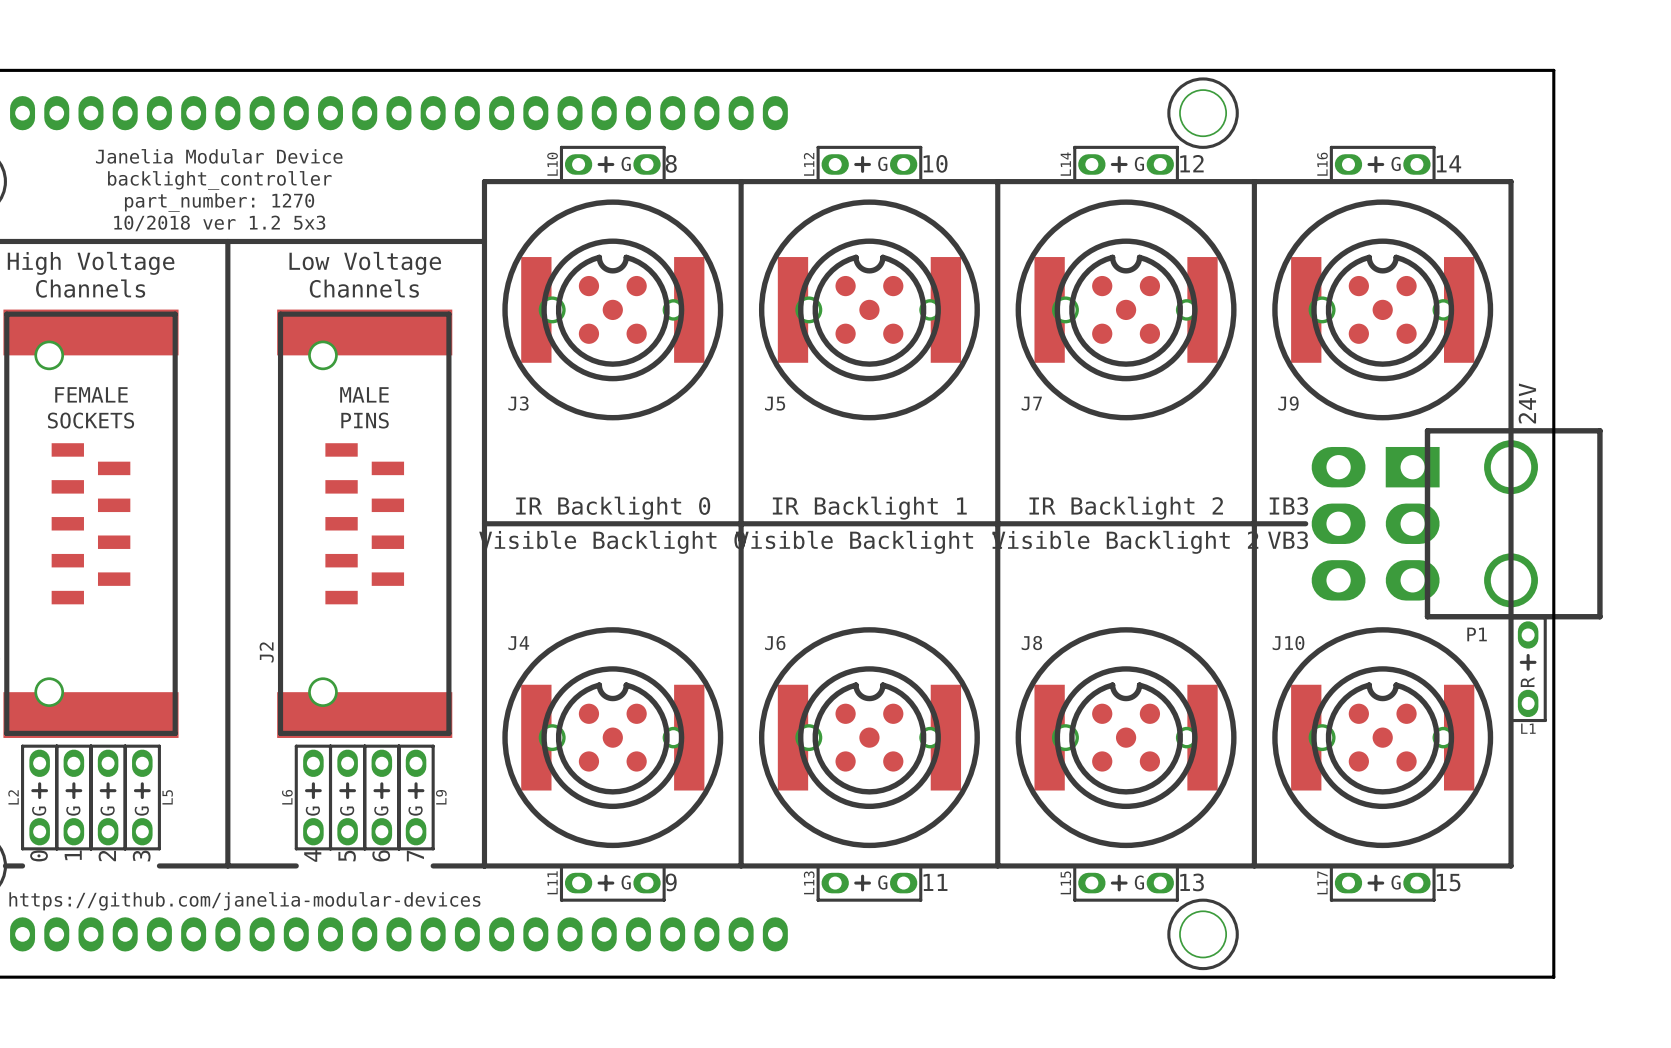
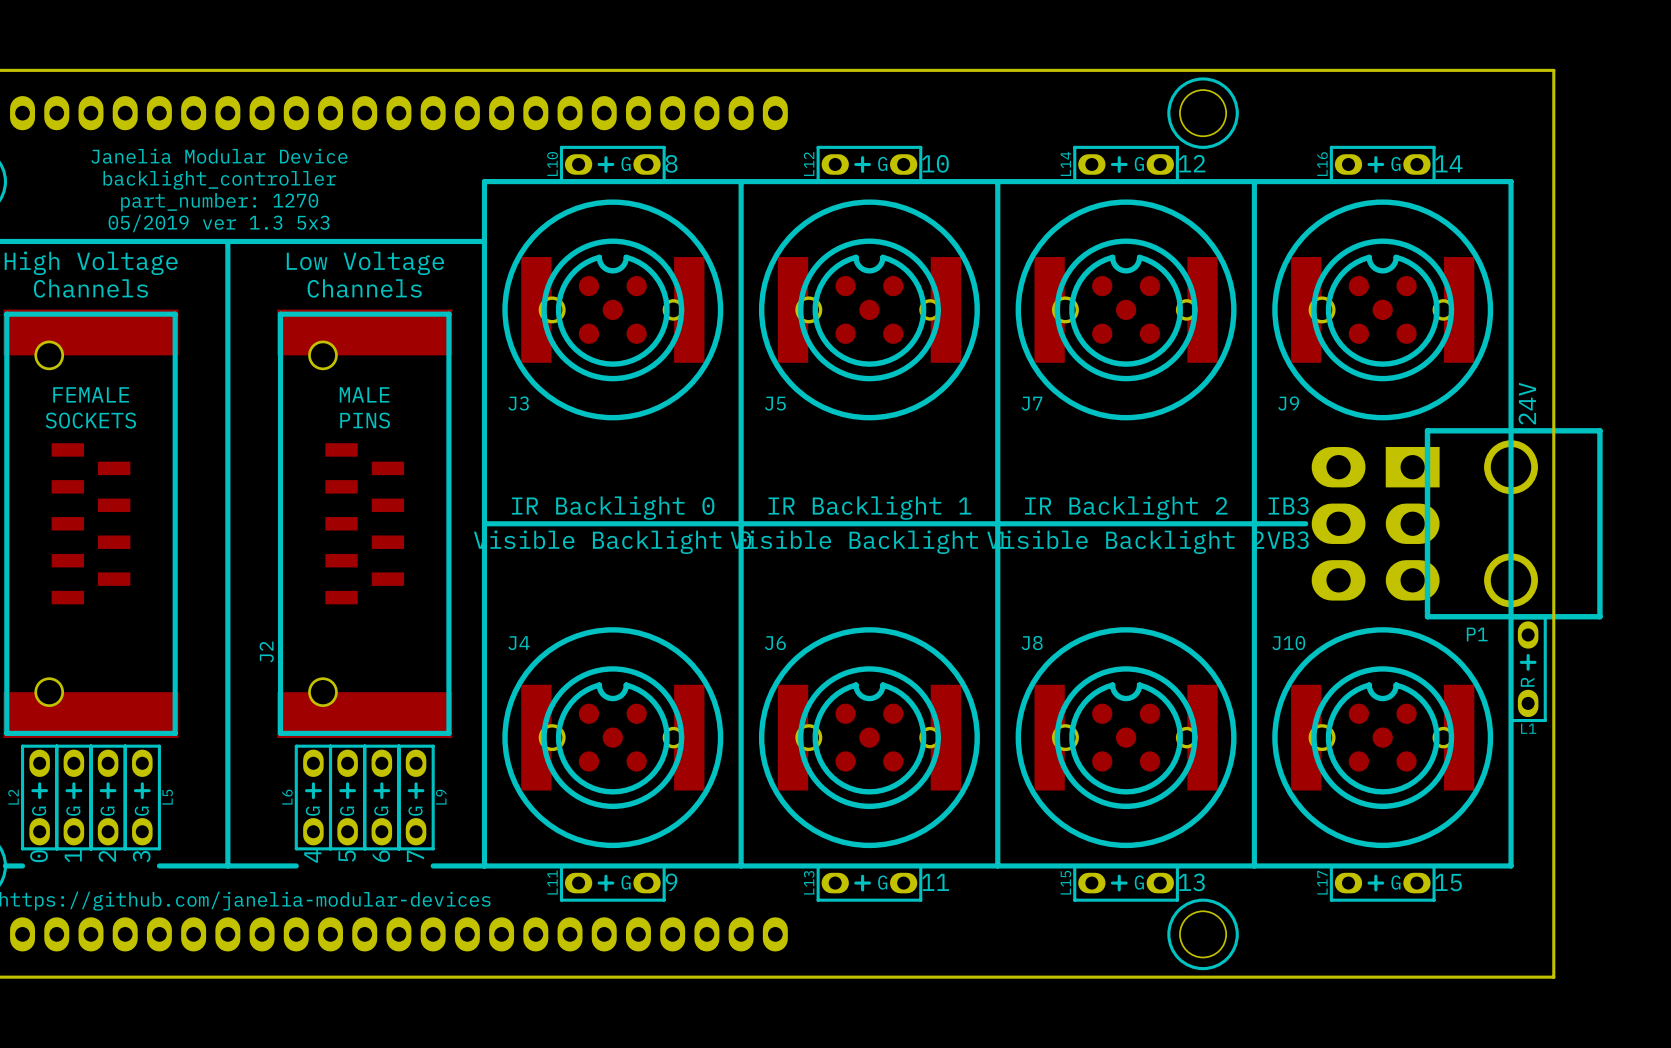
text: 10/2018 ver 1.2 5x3 (219, 223) -> 05/2019 ver 1.3 5x3 (219, 223)

